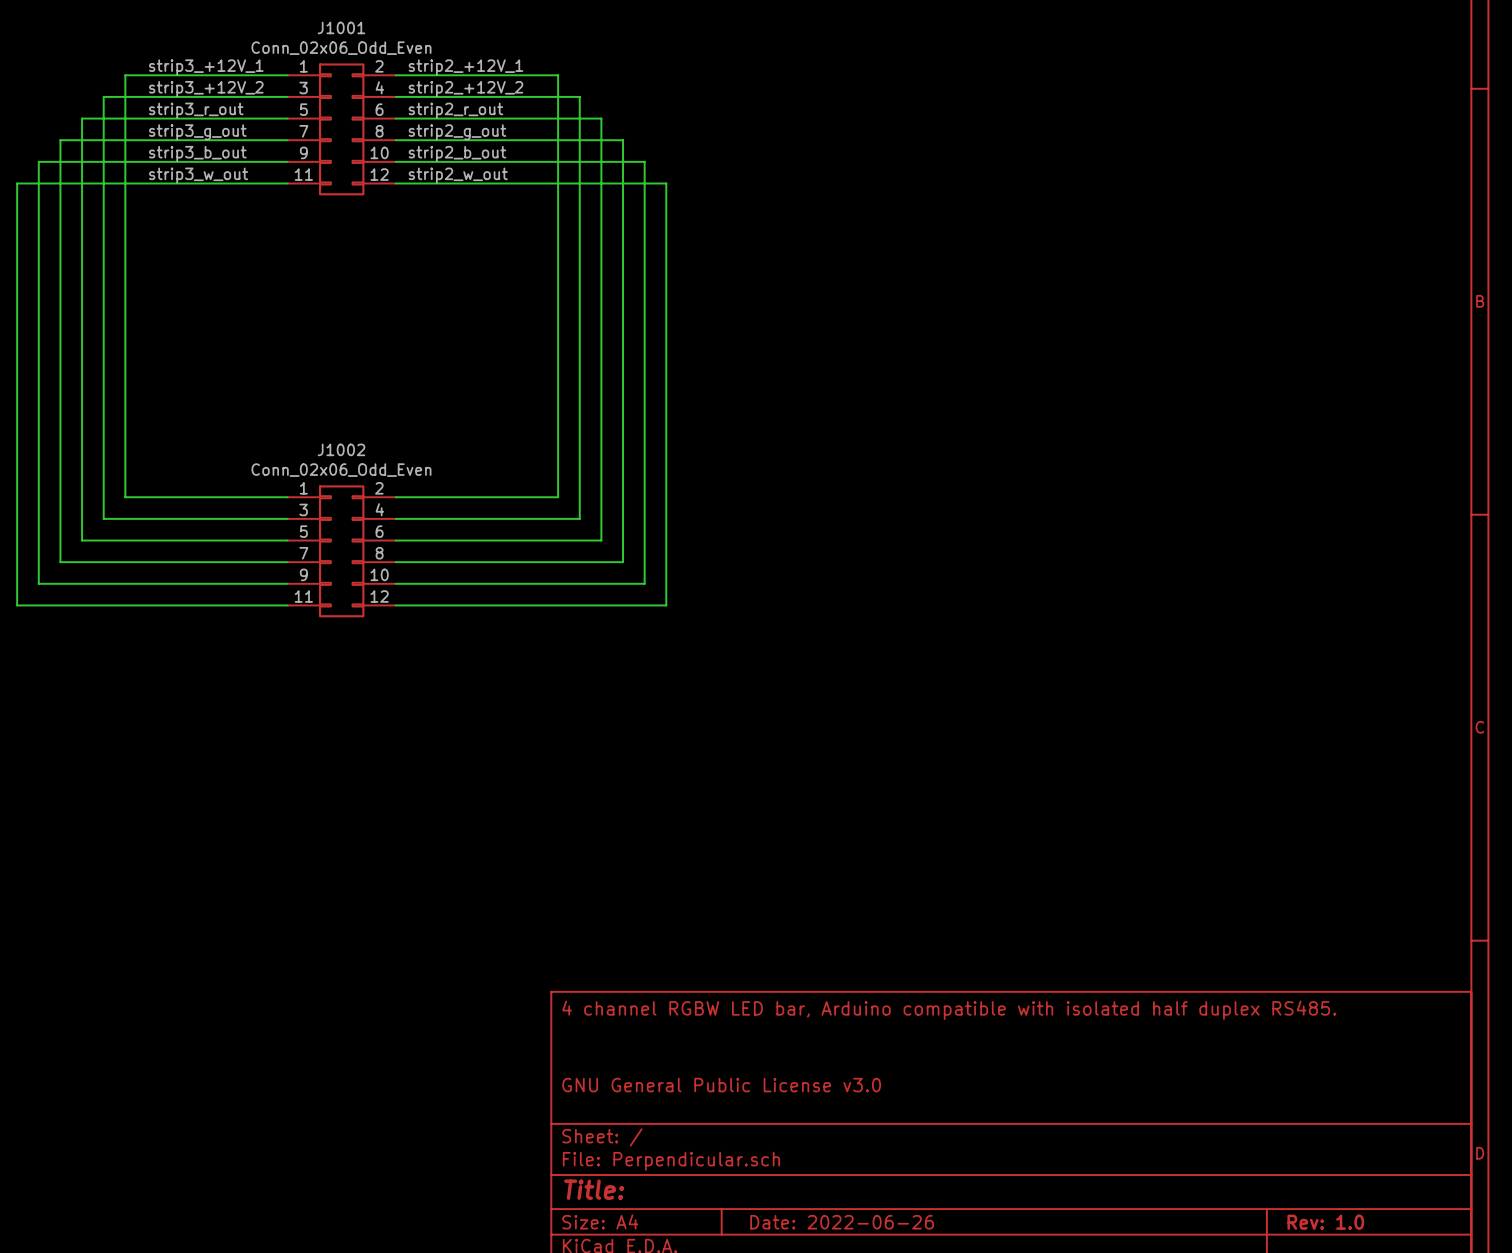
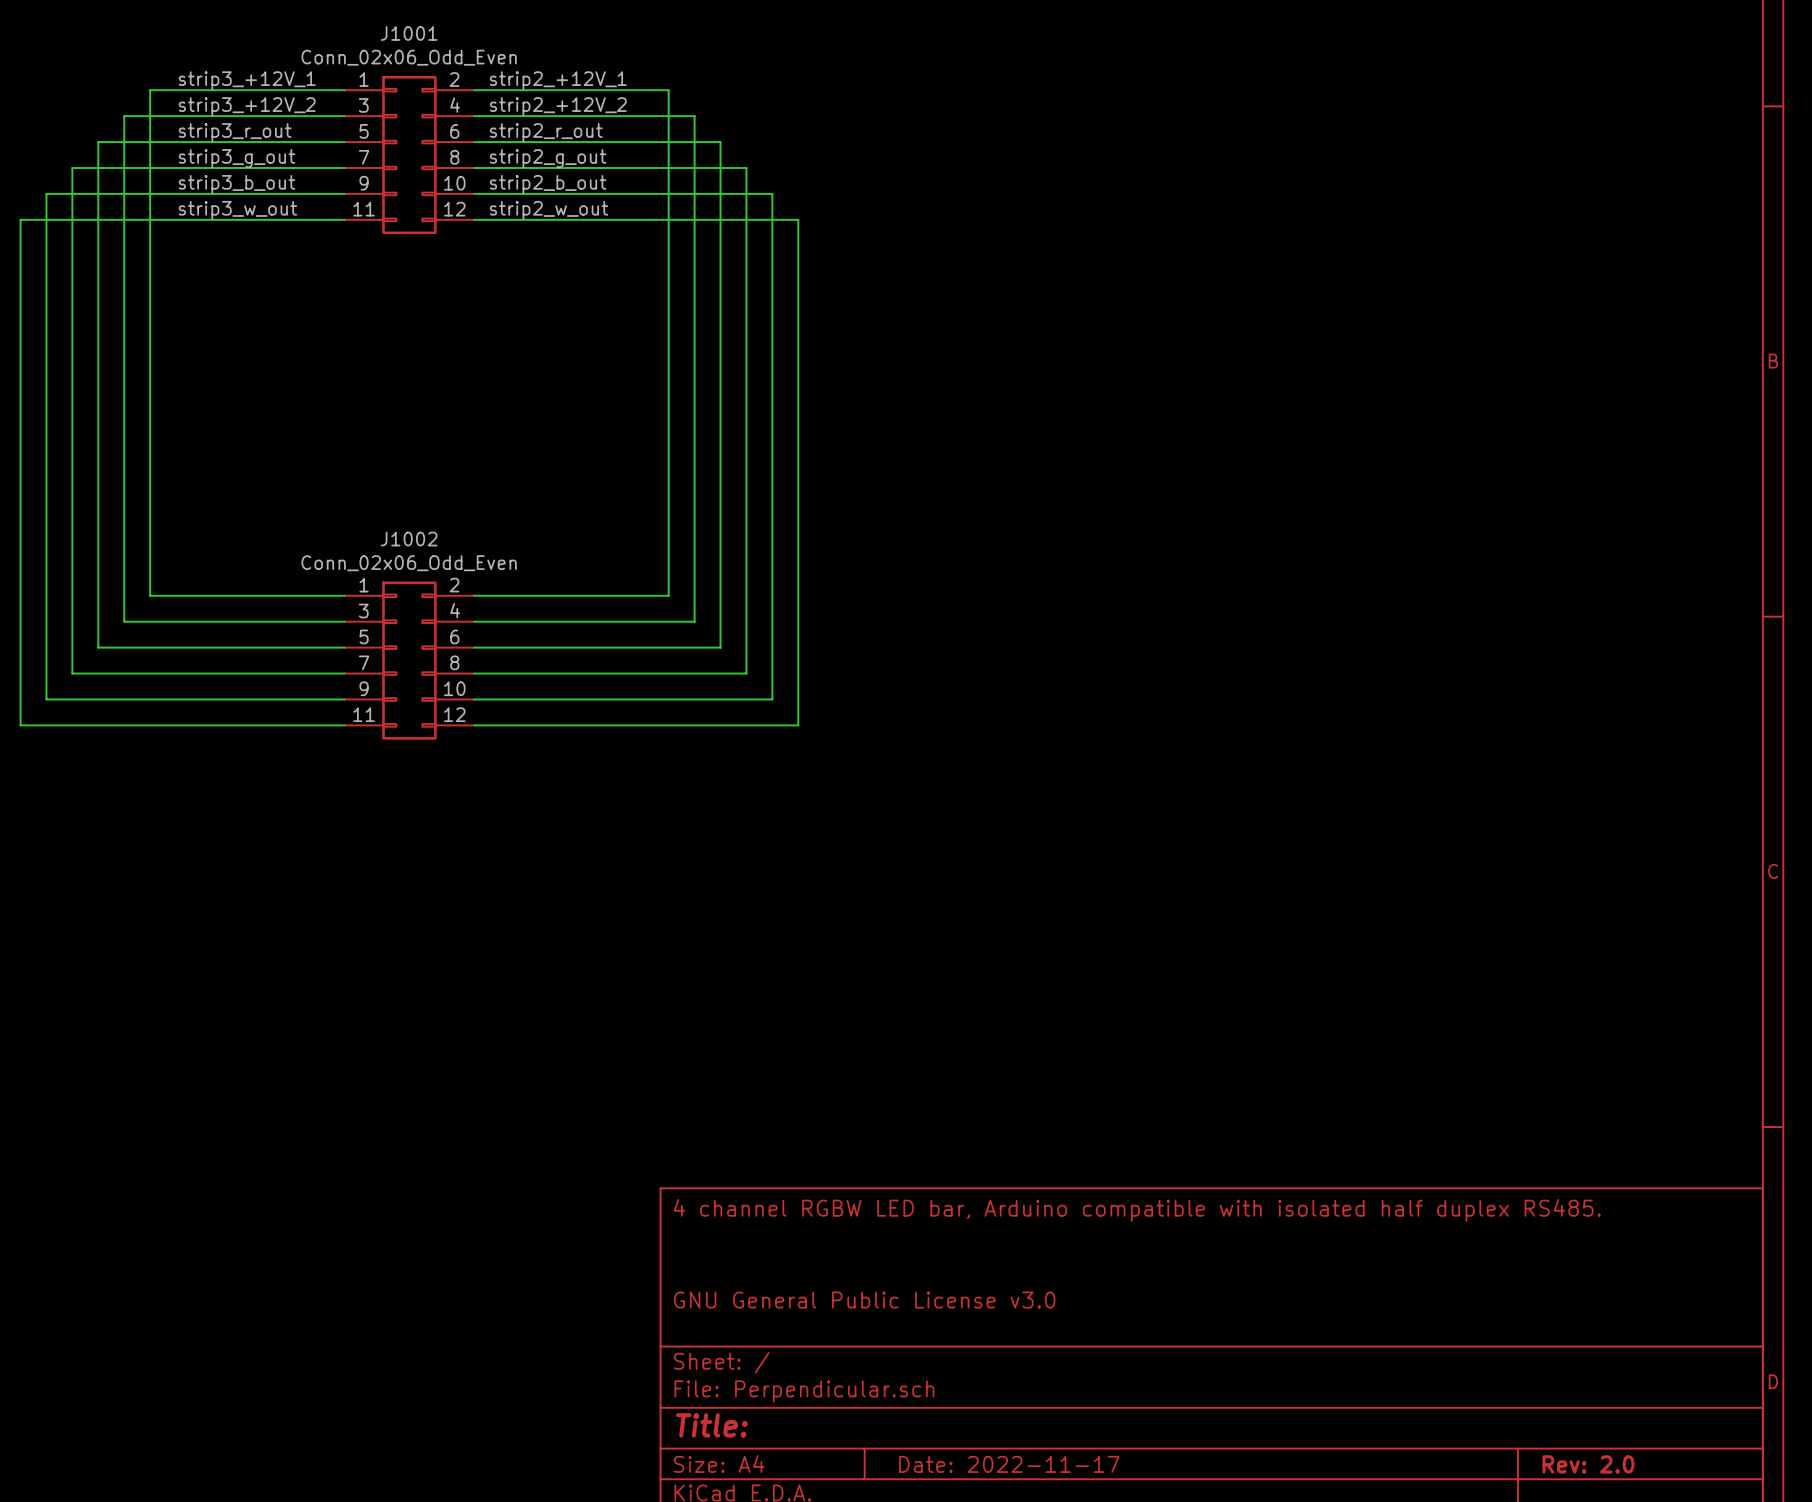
title block: Date: 2022-06-26 (842, 1222) -> Date: 2022-11-17 (1009, 1464)
title block: Rev: 1.0 (1325, 1222) -> Rev: 2.0 (1588, 1464)

